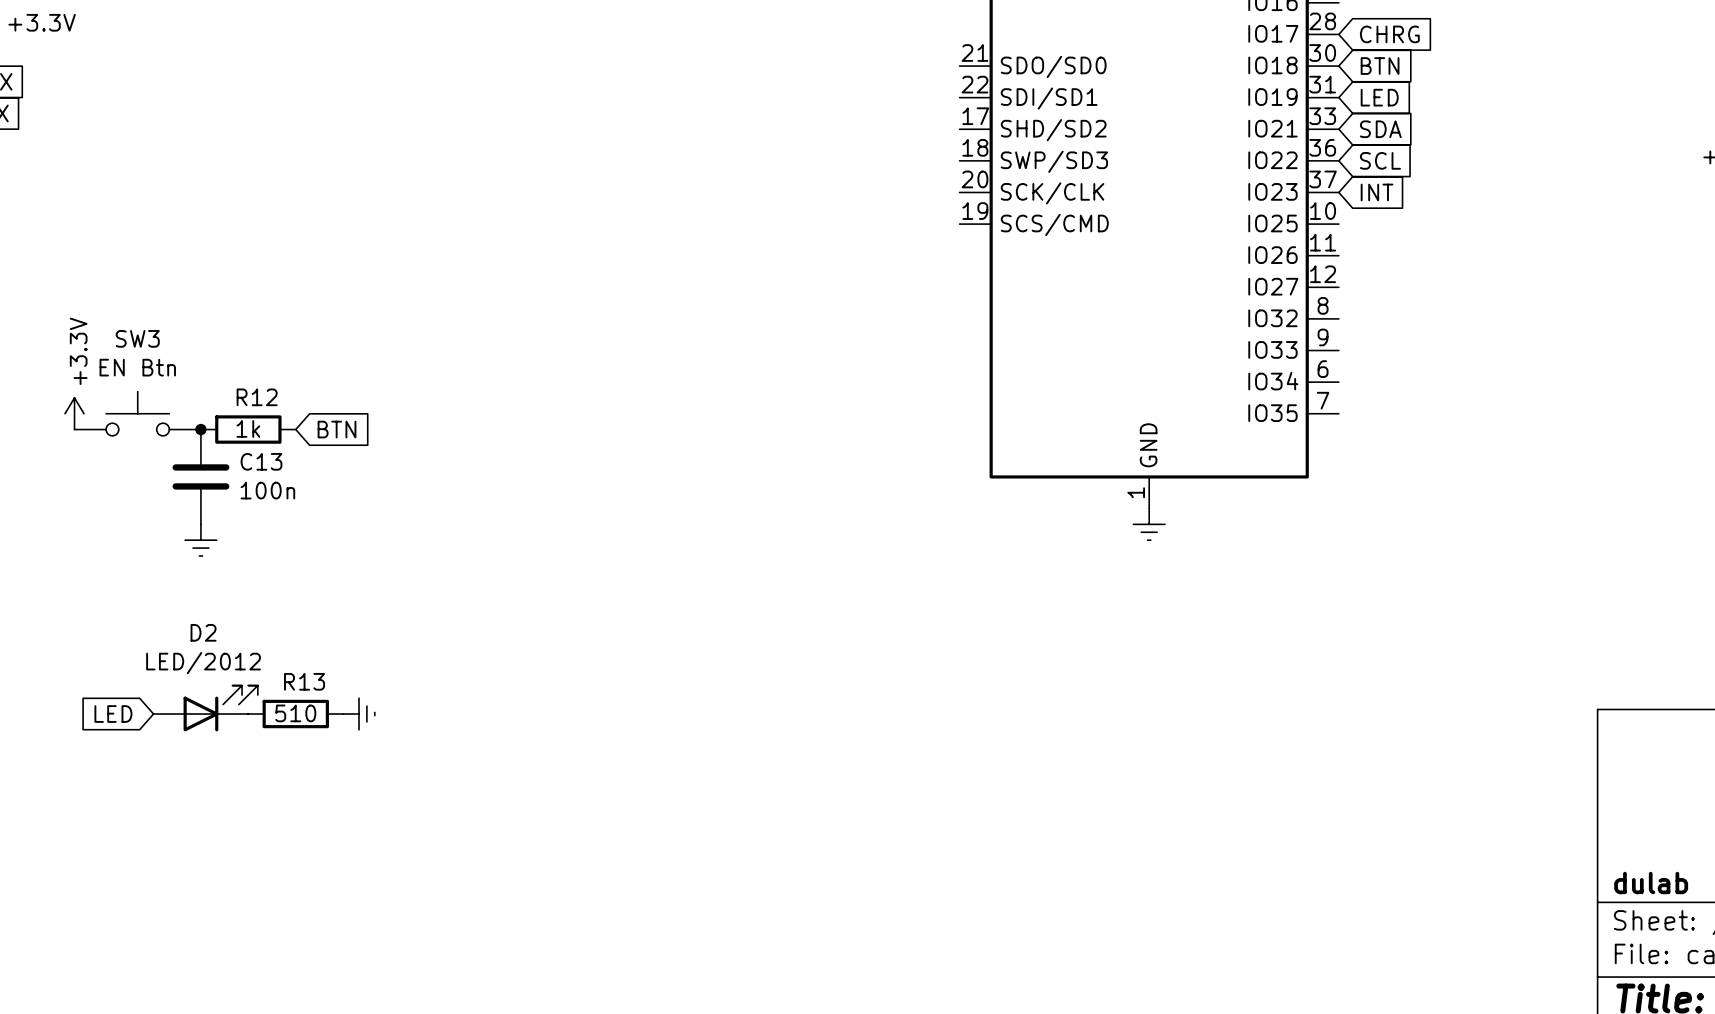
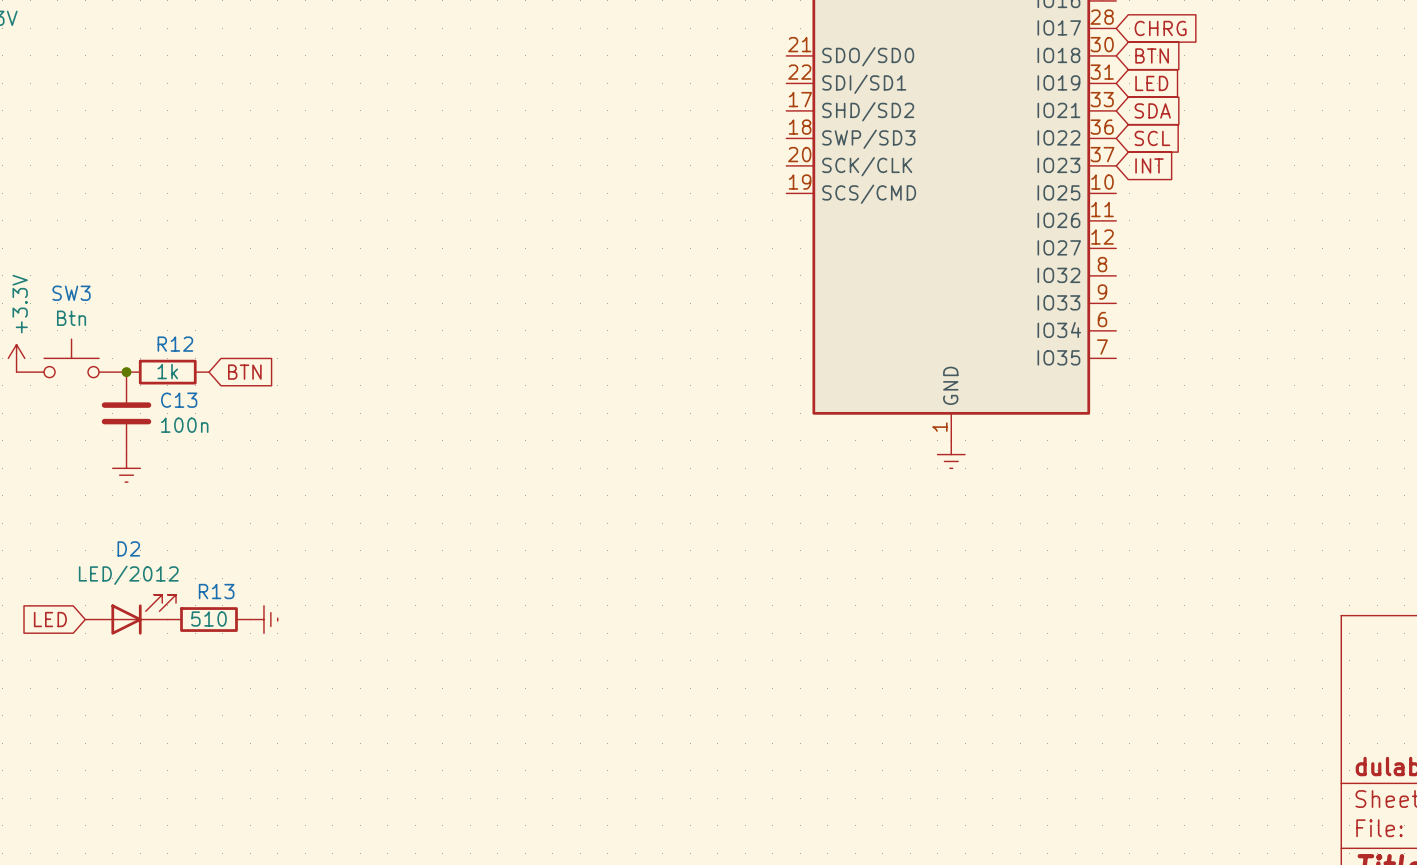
SW3 value: EN Btn (137, 367) -> Btn (71, 318)

